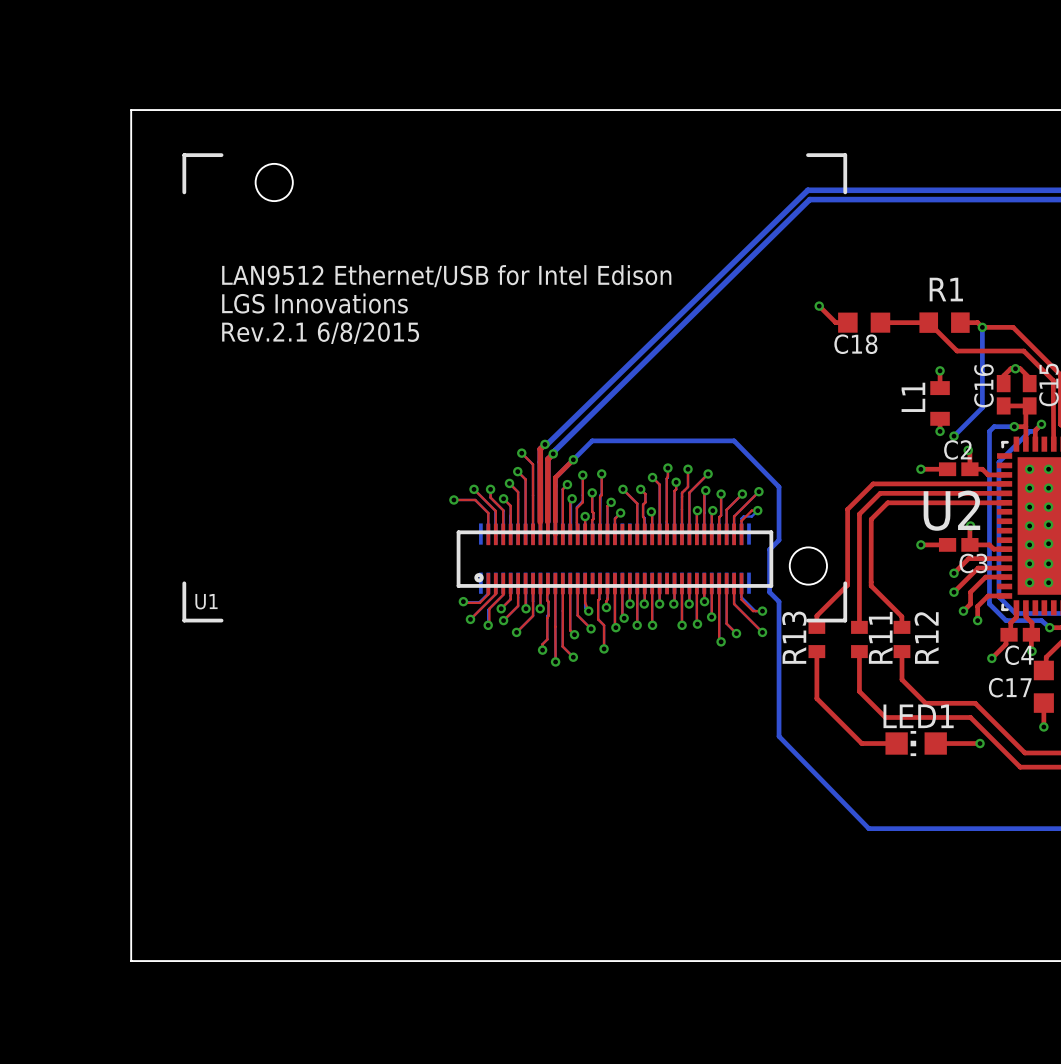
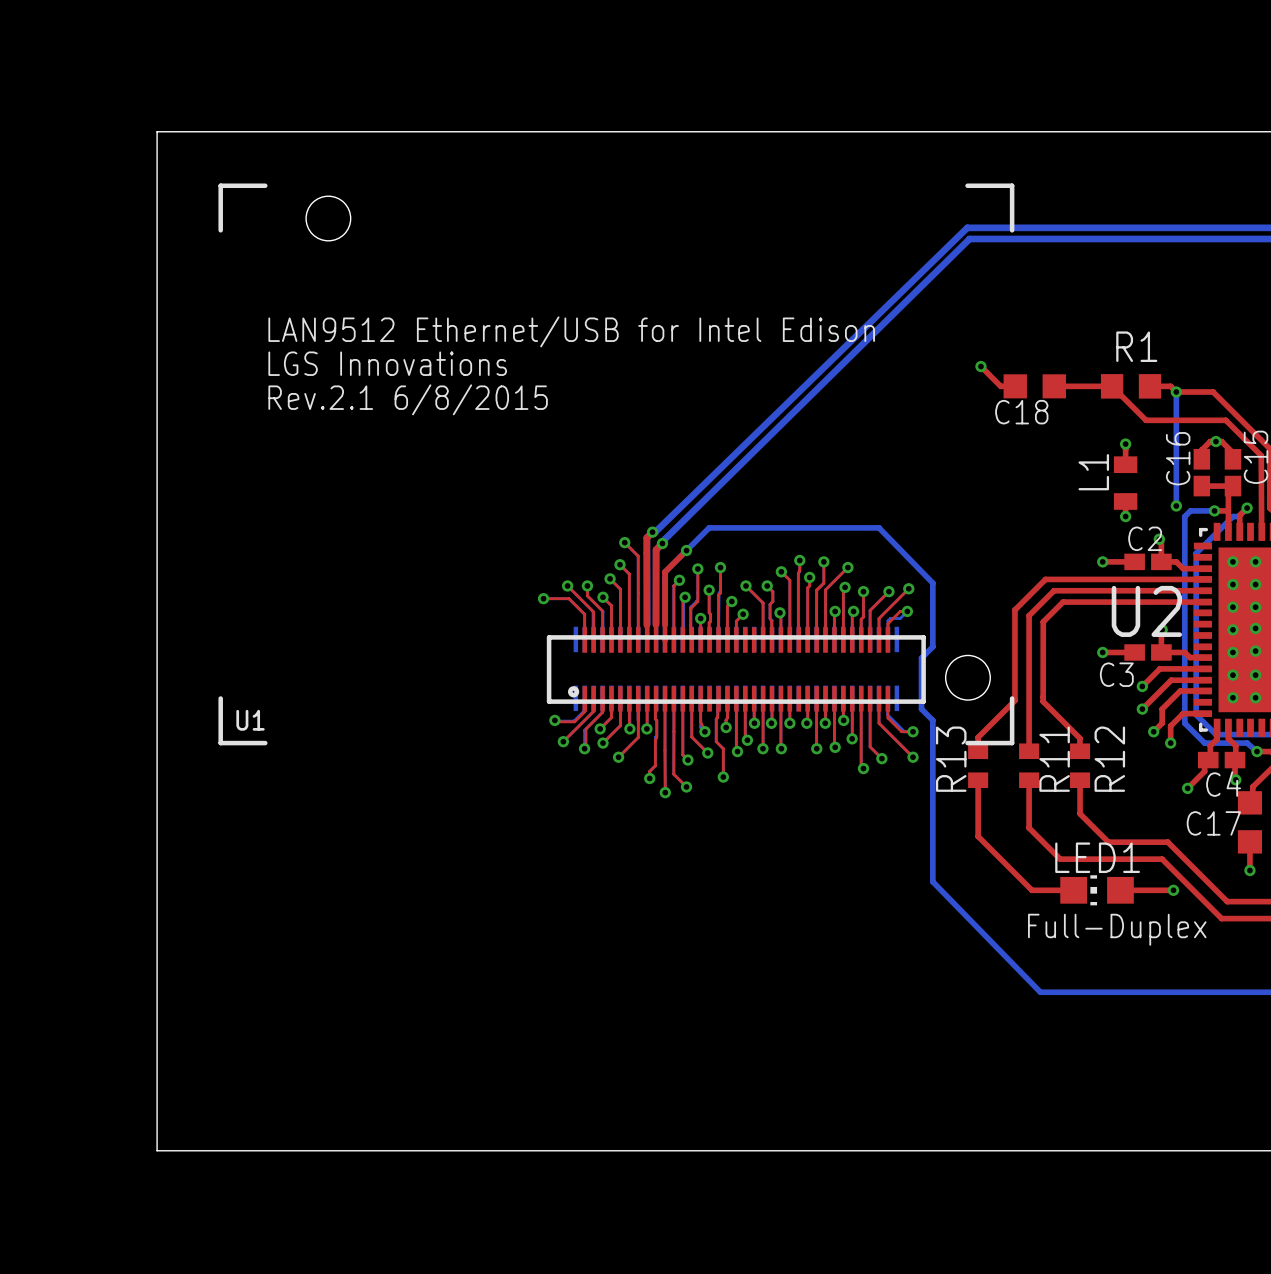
bottom track: (982, 407) (954, 436) -> (1176, 488) (1176, 505)
via position: (954, 436) -> (1176, 505)
C3 name position: C3 (973, 563) -> C3 (1116, 674)
text: none -> Full-Duplex (1117, 929)

